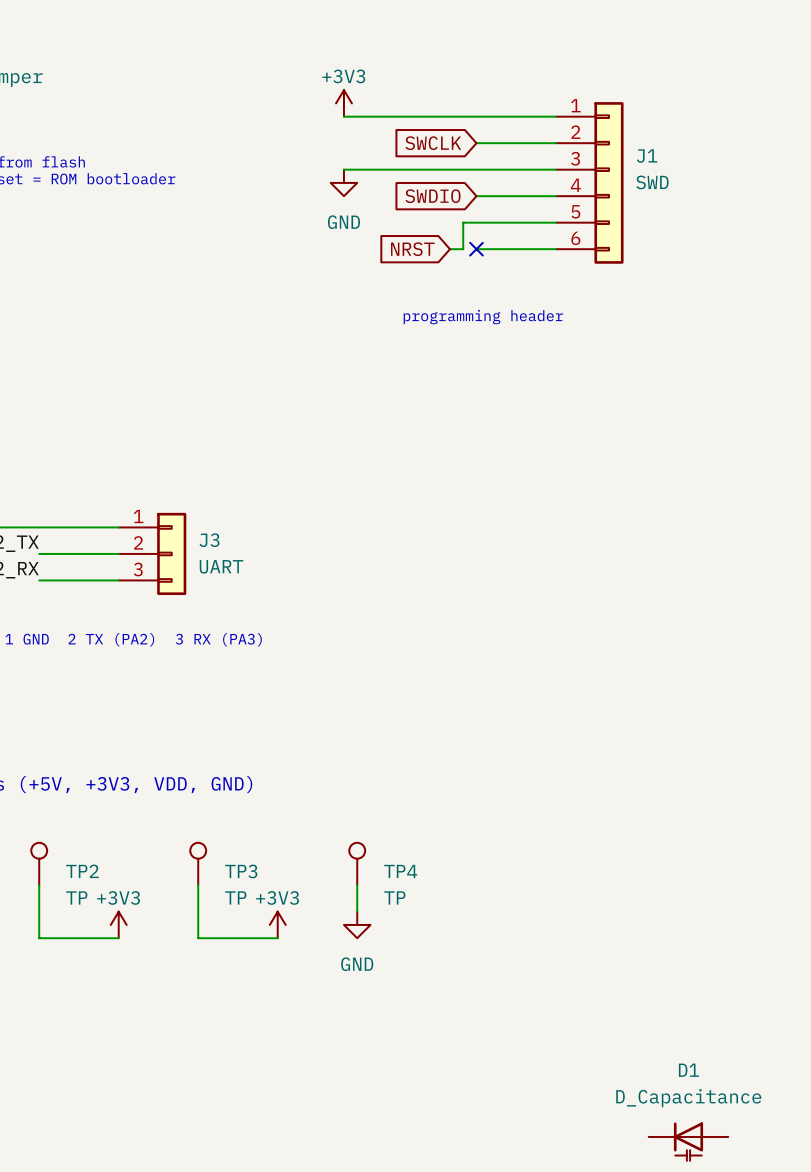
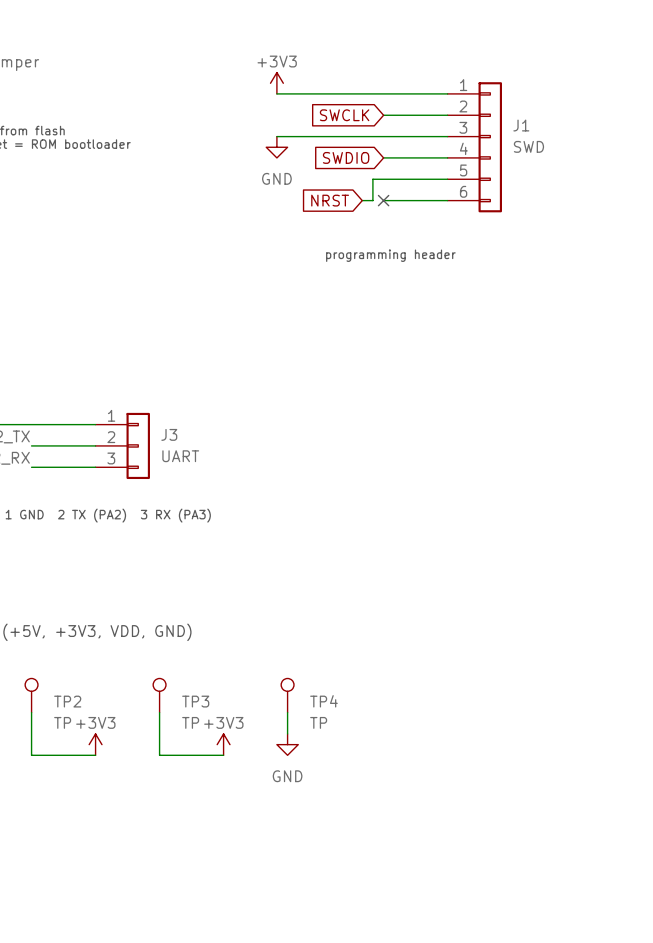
D1: D_Capacitance (688, 1141) -> none

